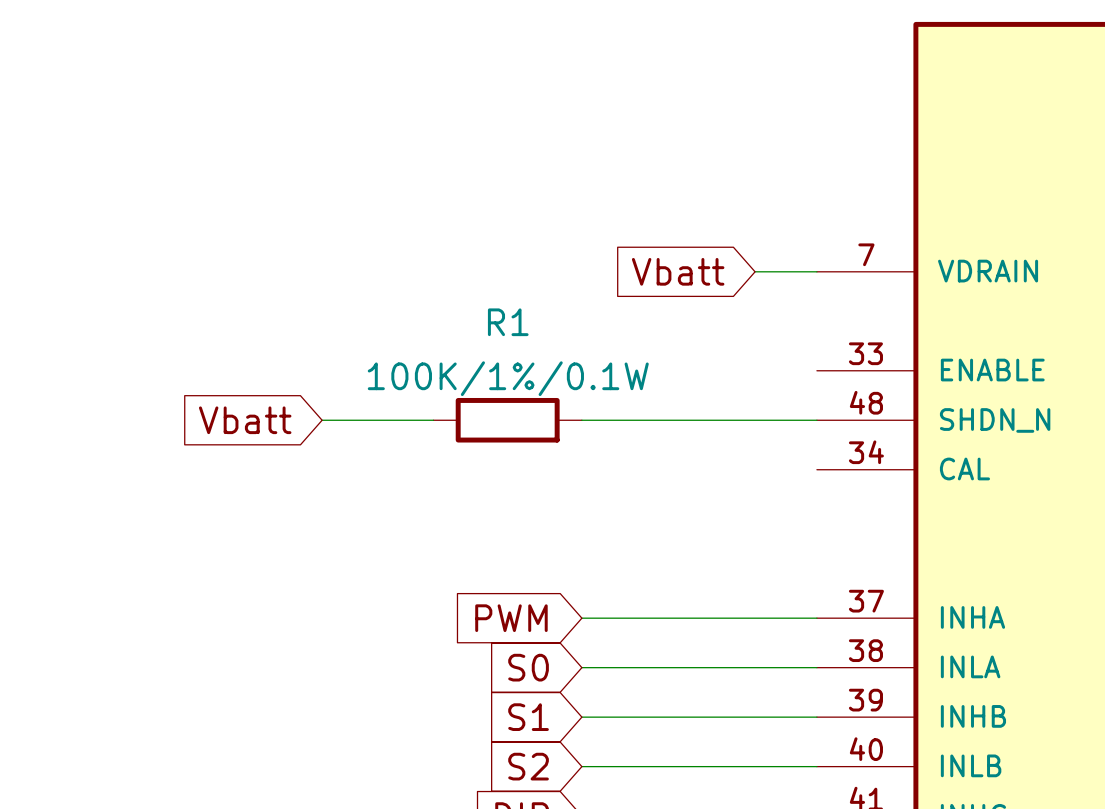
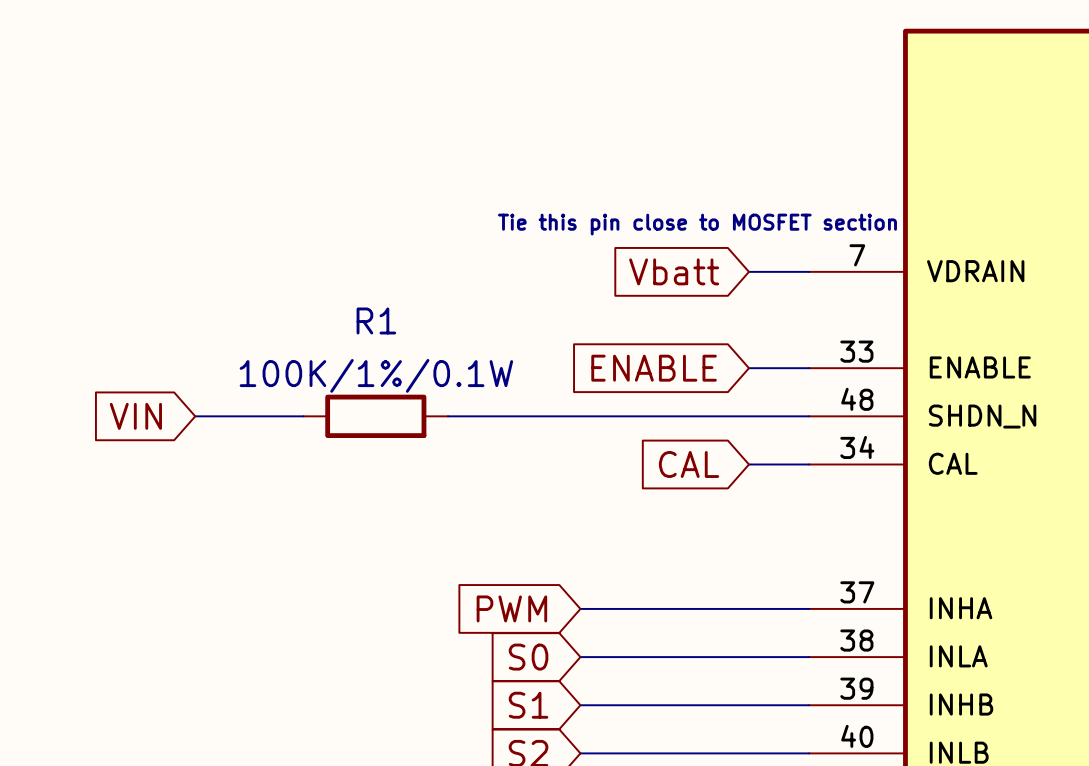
text: none -> Tie this pin close to MOSFET section (697, 224)
global label: none -> ENABLE (654, 368)
wire: none -> (748, 368) (809, 368)
global label: none -> VIN (135, 416)
global label: Vbatt (245, 420) -> none
wire: (322, 420) (433, 420) -> (195, 416) (303, 416)
wire: none -> (448, 416) (580, 416)
R1 position: (507, 420) -> (375, 416)
global label: none -> CAL (689, 464)
wire: none -> (748, 464) (809, 464)

